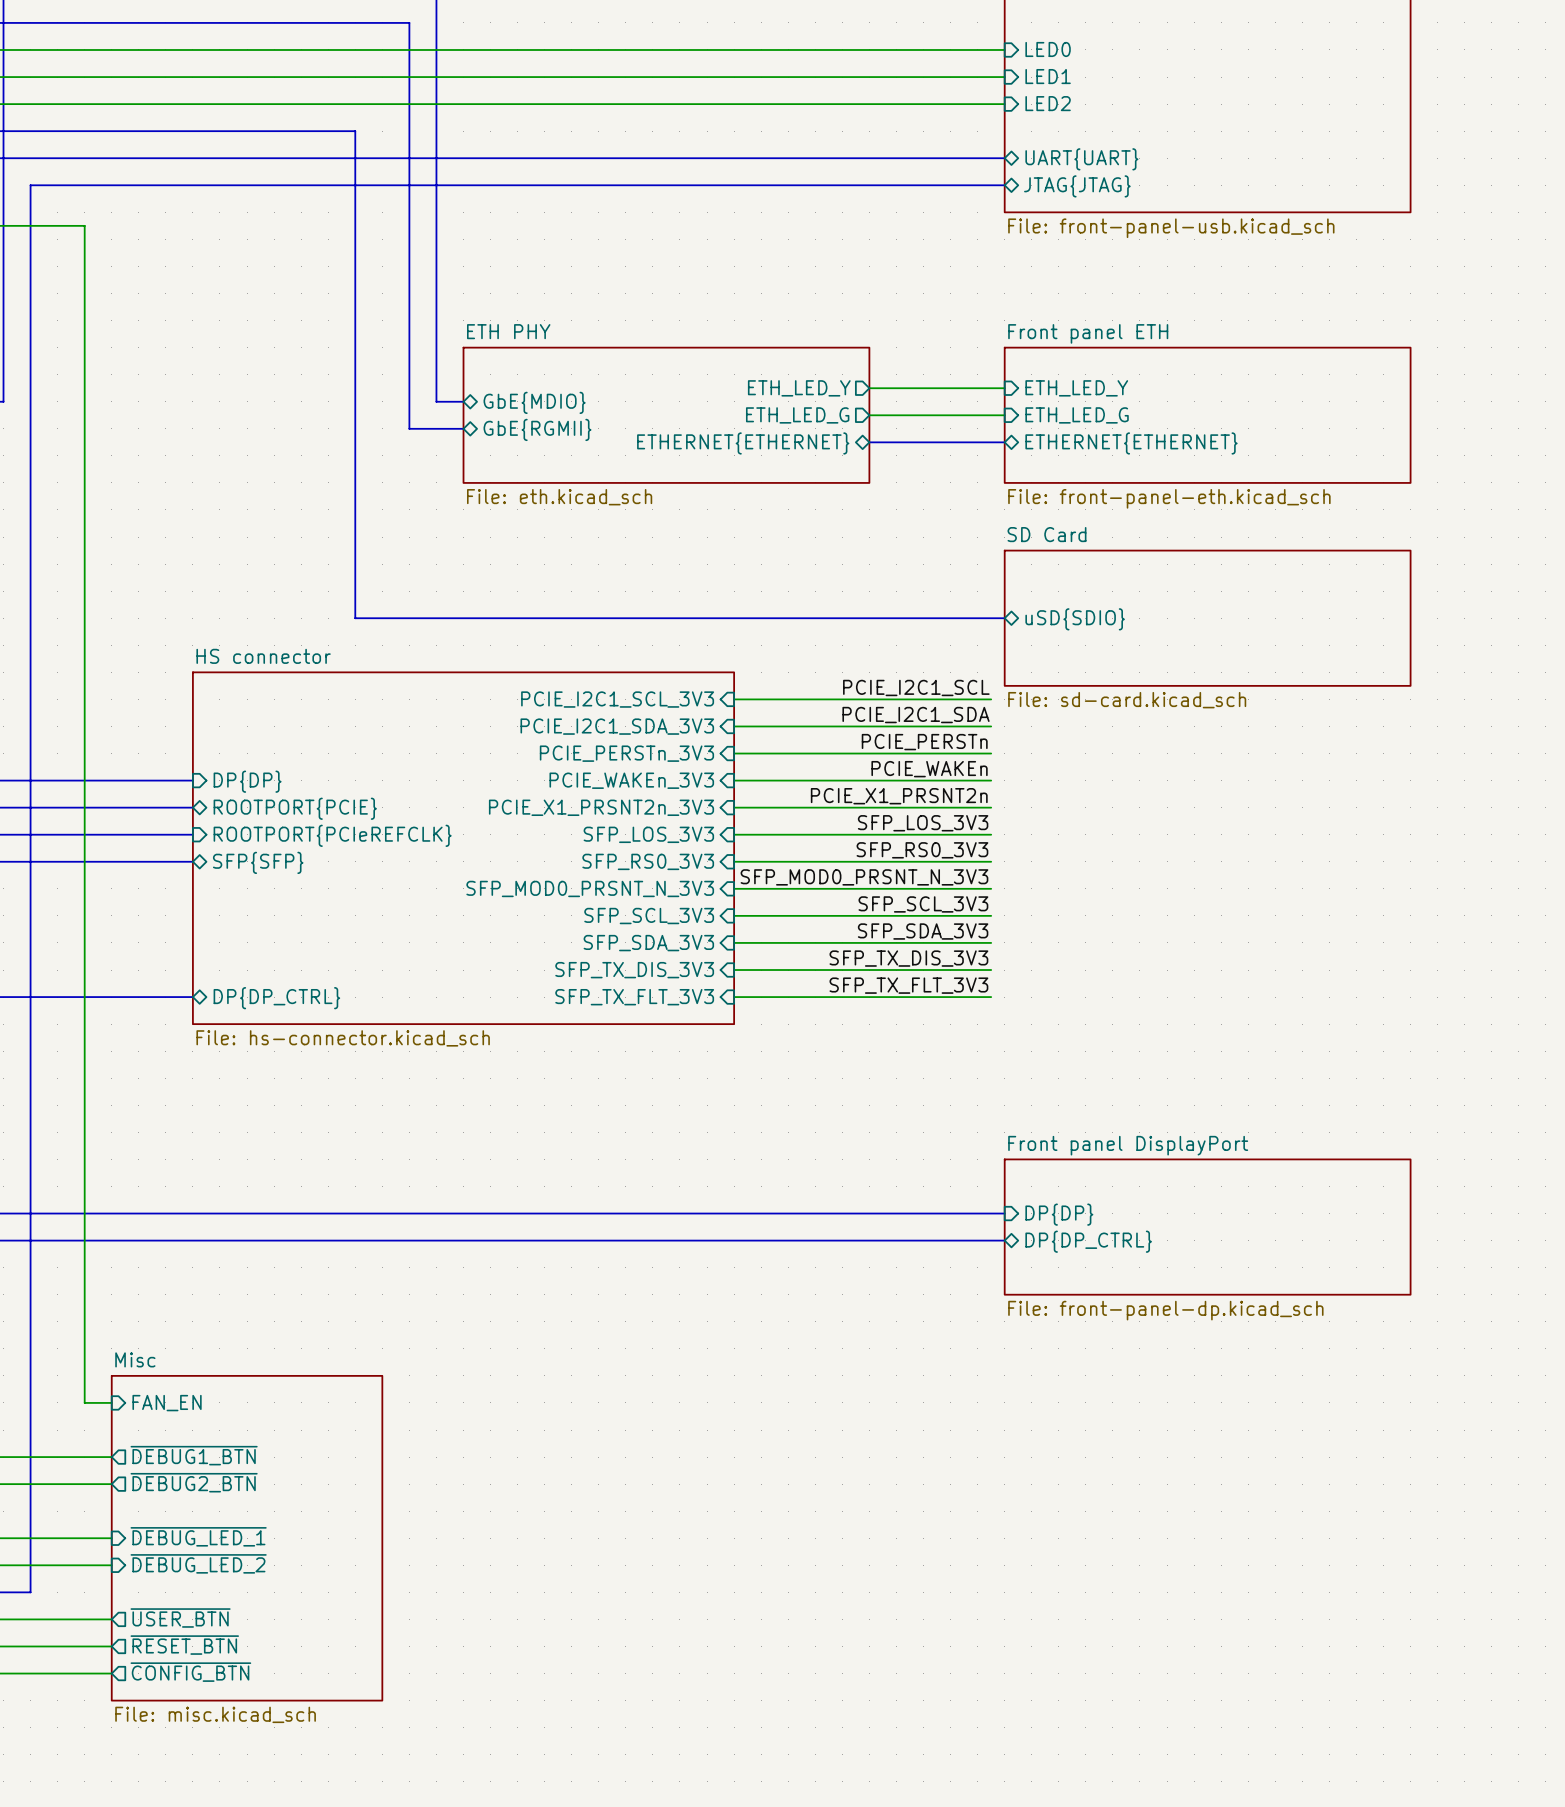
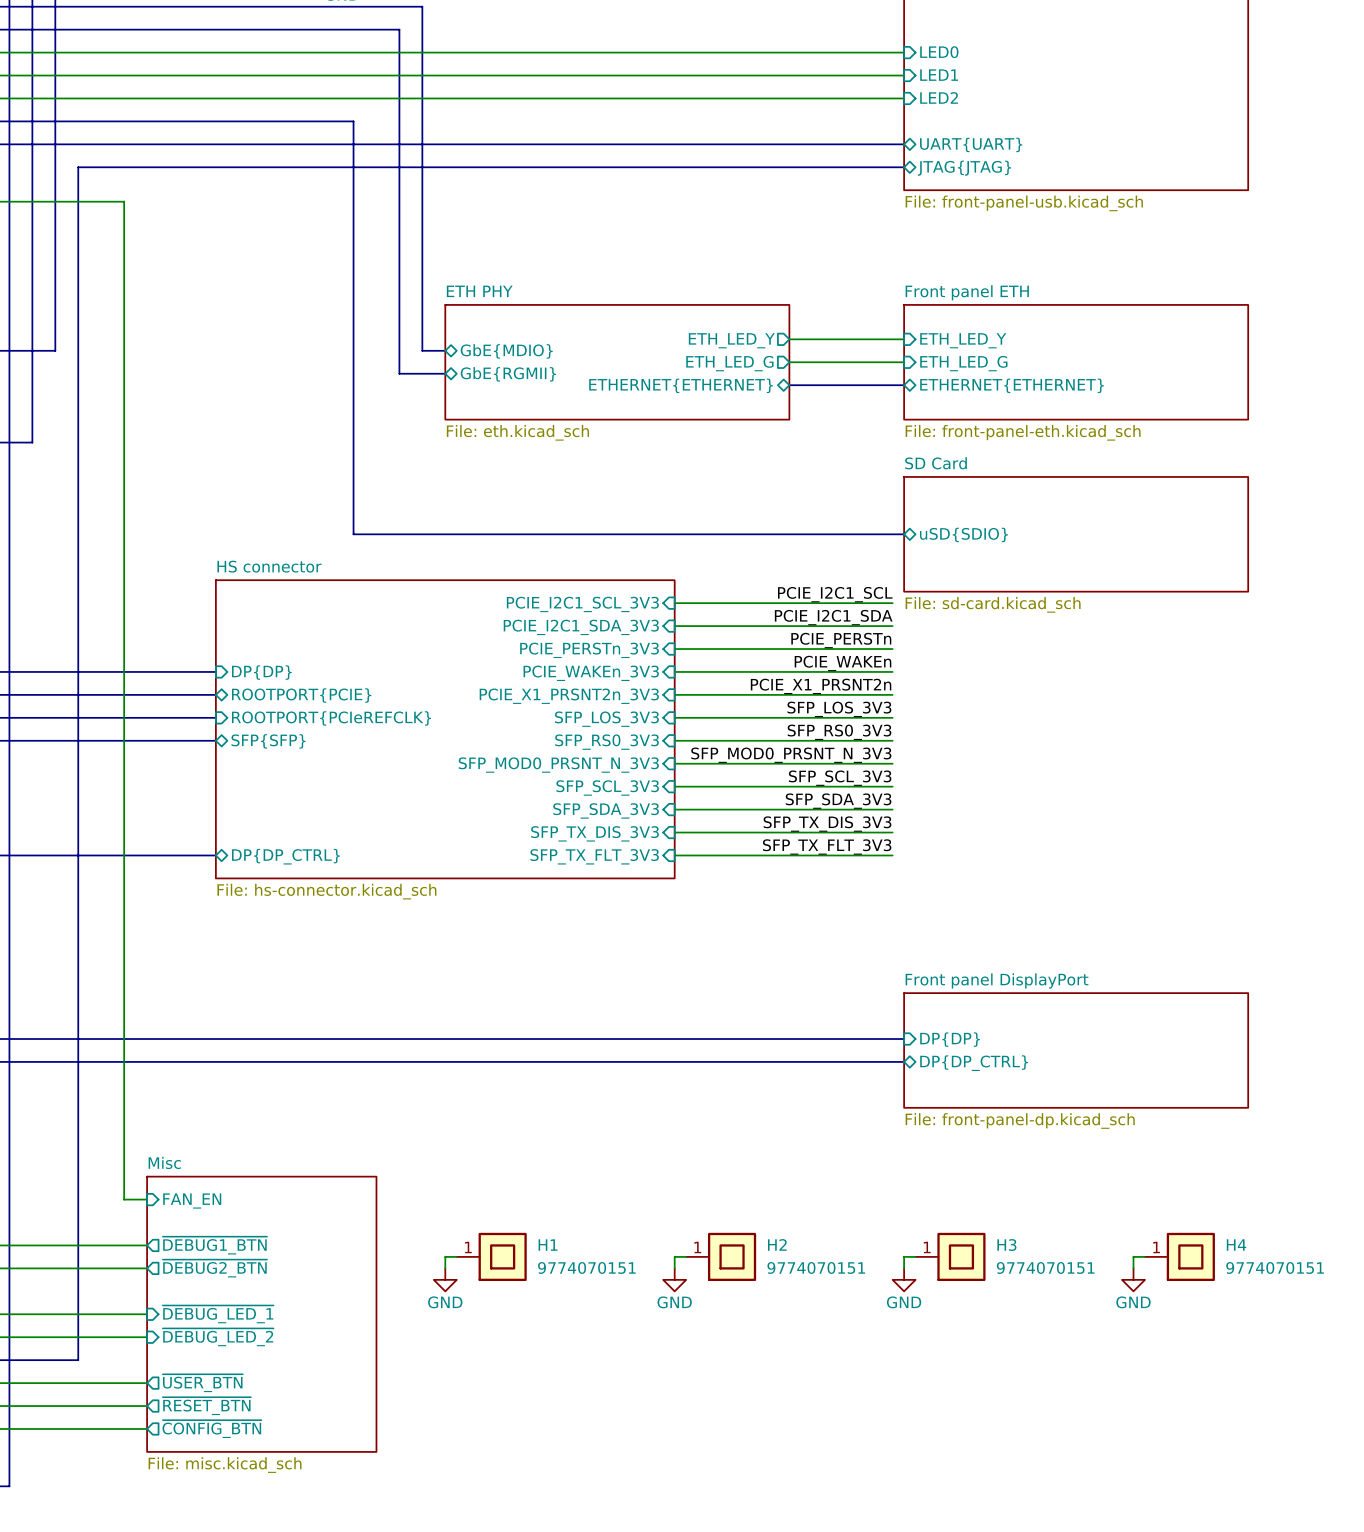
wire: none -> (456, 1256) (445, 1256) (445, 1268)
H1: none -> (491, 1256)
wire: none -> (686, 1256) (674, 1256) (674, 1268)
H2: none -> (721, 1256)
wire: none -> (915, 1256) (904, 1256) (904, 1268)
H3: none -> (950, 1256)
wire: none -> (1144, 1256) (1133, 1256) (1133, 1268)
H4: none -> (1179, 1256)
power symbol: none -> GND (445, 1279)
power symbol: none -> GND (674, 1279)
power symbol: none -> GND (904, 1279)
power symbol: none -> GND (1133, 1279)

